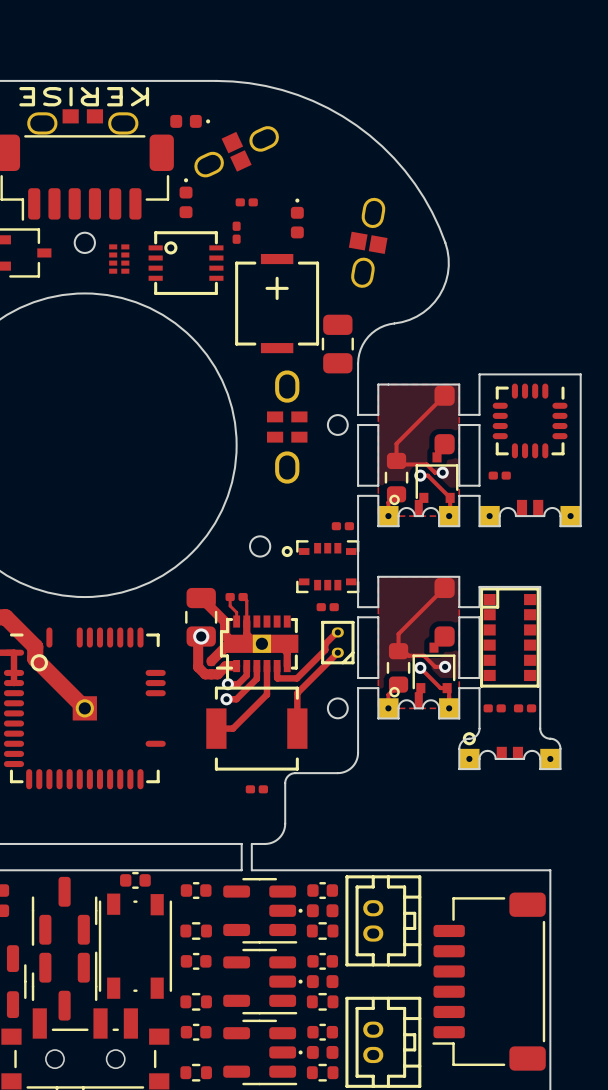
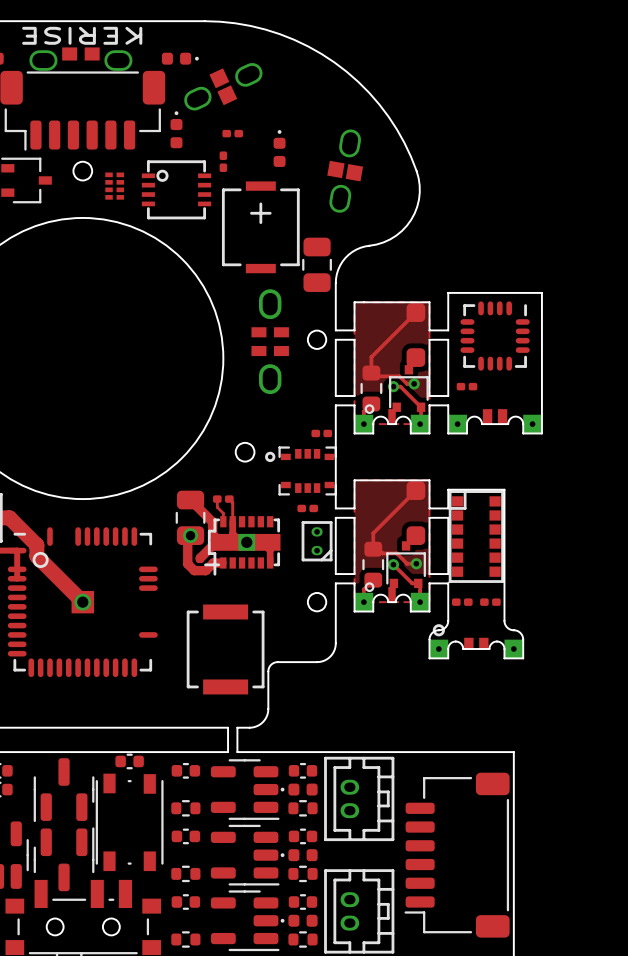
track: (337, 632) (325, 644) (325, 650) (296, 678) (277, 678) (277, 666) -> none
track: (337, 652) (297, 693) (297, 728) -> none
track: (246, 666) (246, 675) (238, 684) (227, 684) -> none
track: (256, 666) (256, 678) (236, 699) (226, 699) -> none
track: (266, 666) (266, 694) (232, 728) (216, 728) -> none
via: (227, 684) -> none
via: (226, 699) -> none
part: (256, 728) -> none
part: none -> (225, 649)
part: (256, 789) -> none

